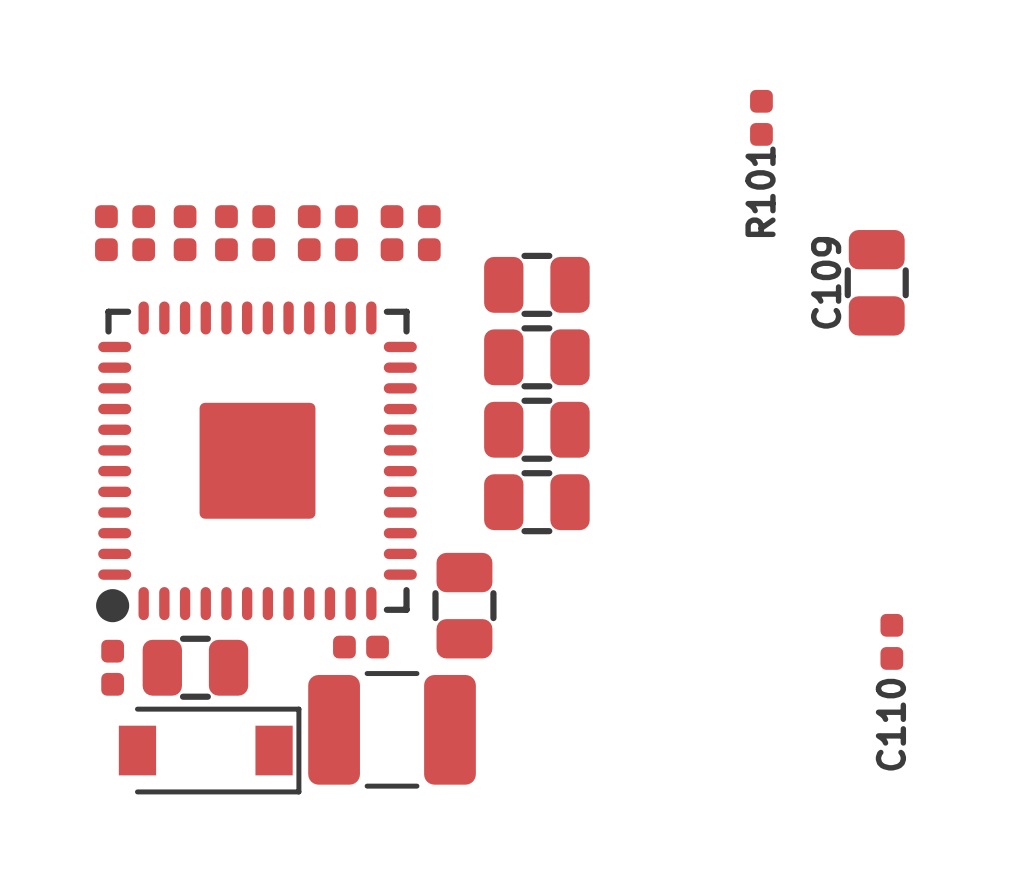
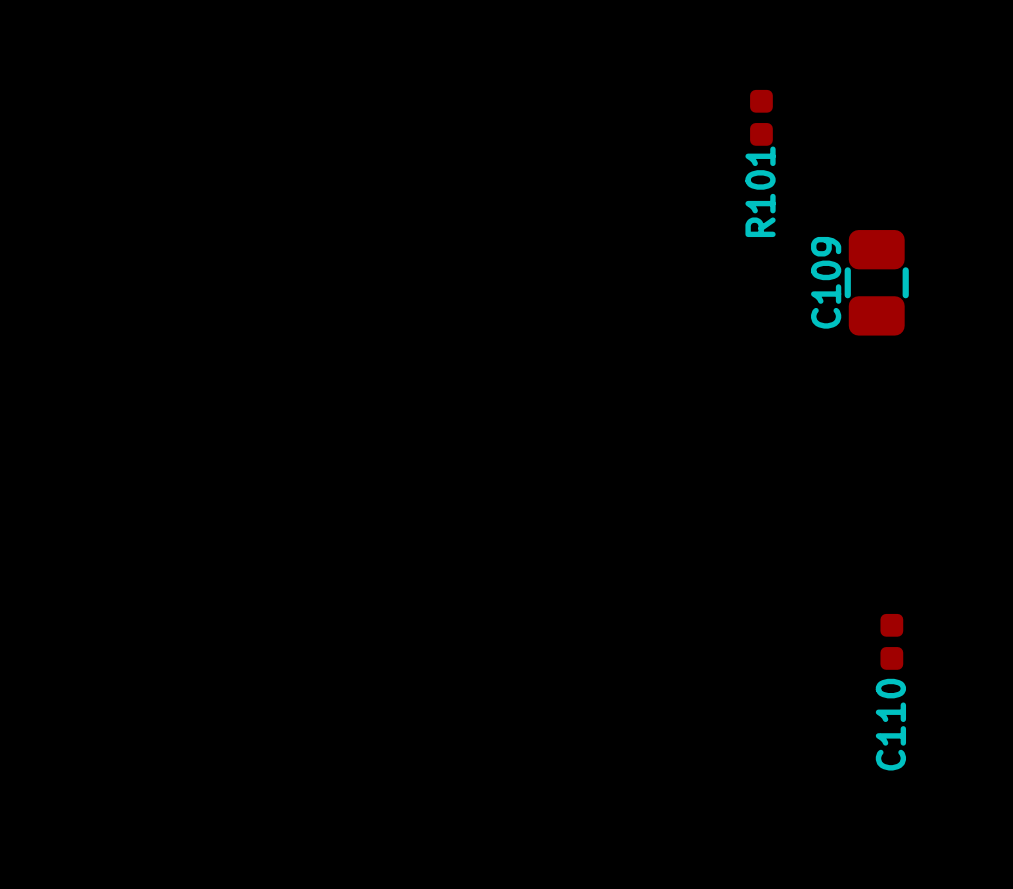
part: (106, 233) -> none
part: (143, 233) -> none
part: (185, 233) -> none
part: (226, 233) -> none
part: (263, 233) -> none
part: (309, 233) -> none
part: (346, 233) -> none
part: (392, 233) -> none
part: (429, 233) -> none
part: (536, 284) -> none
part: (536, 357) -> none
part: (536, 429) -> none
part: (256, 461) -> none
part: (536, 502) -> none
part: (464, 605) -> none
part: (360, 647) -> none
part: (112, 667) -> none
part: (195, 667) -> none
part: (392, 729) -> none
part: (210, 750) -> none

